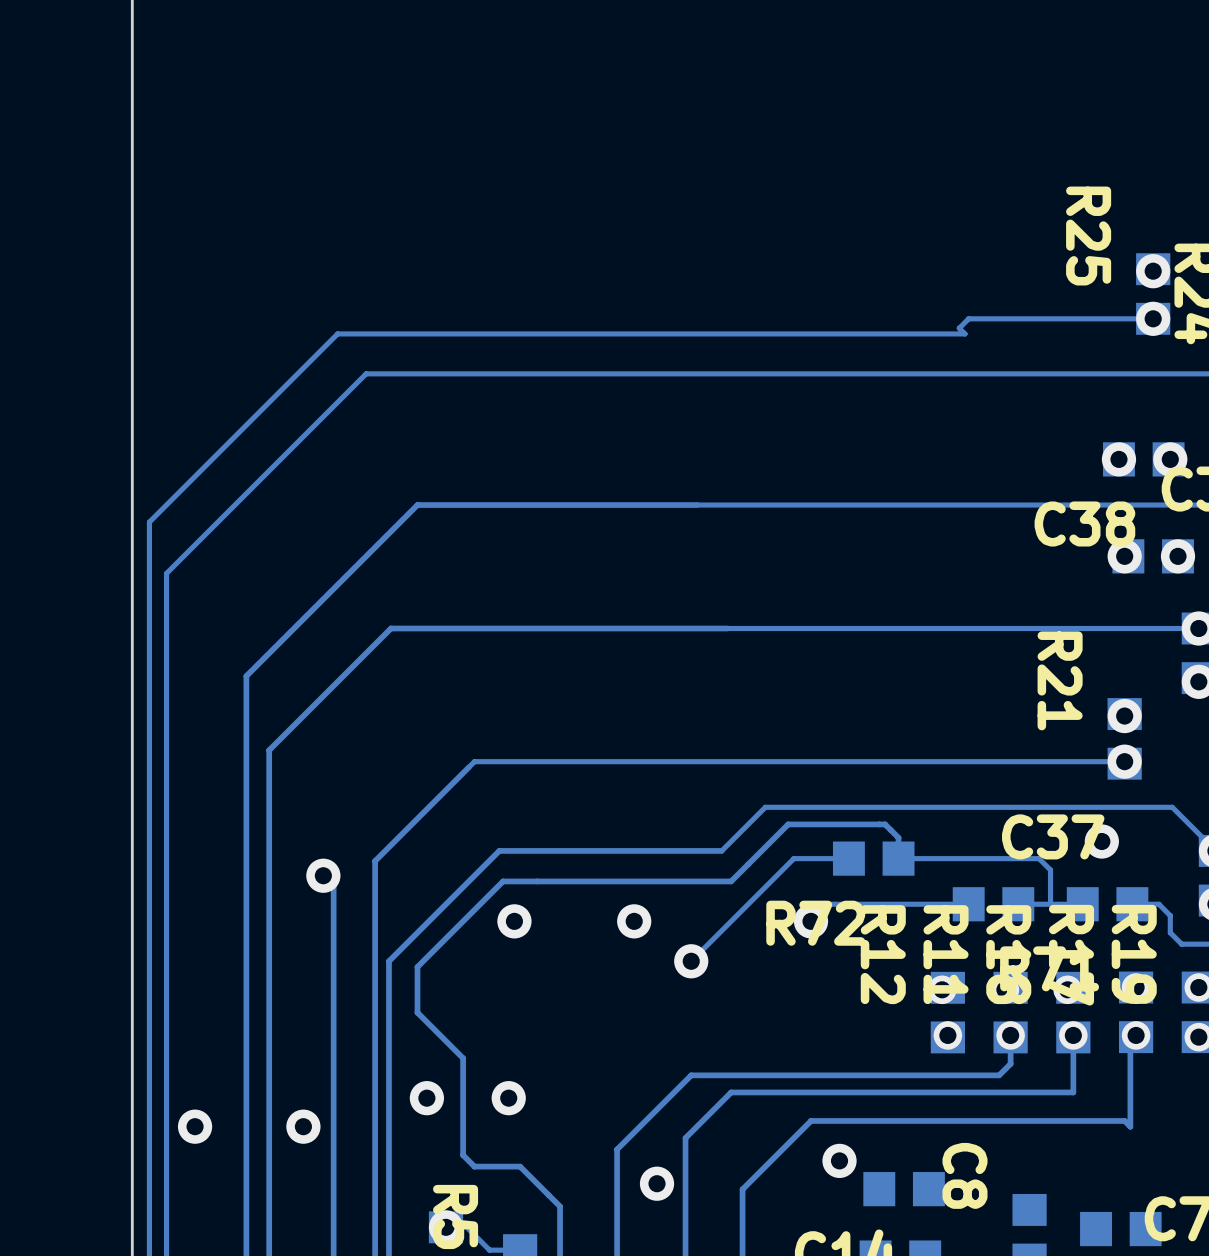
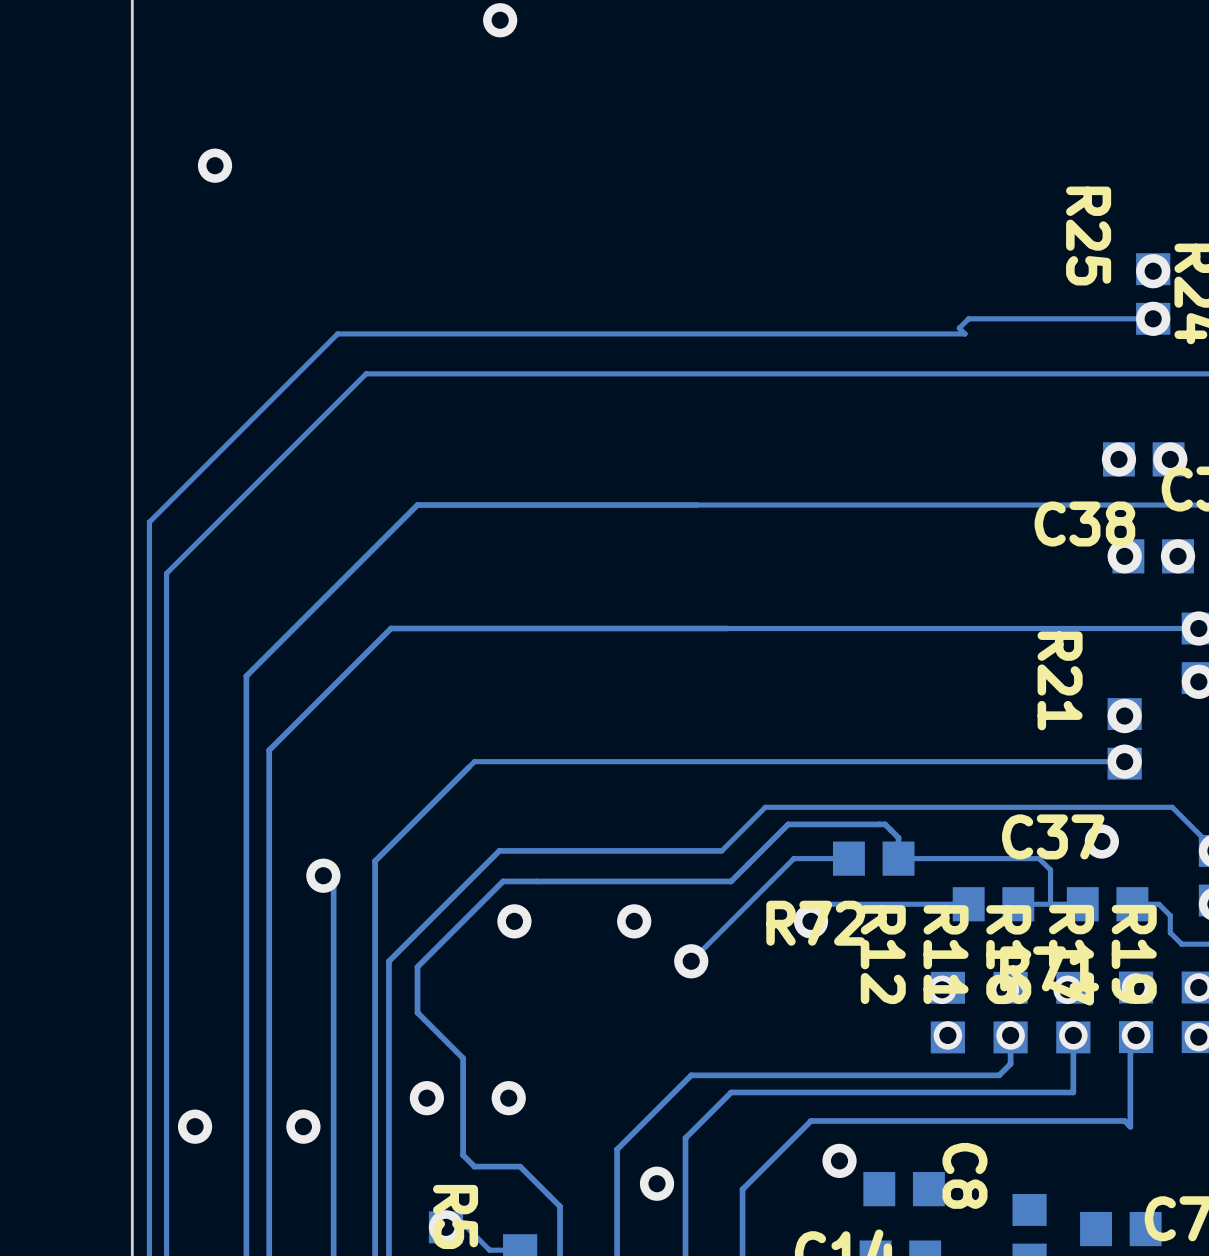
via: none -> (500, 20)
via: none -> (215, 165)

